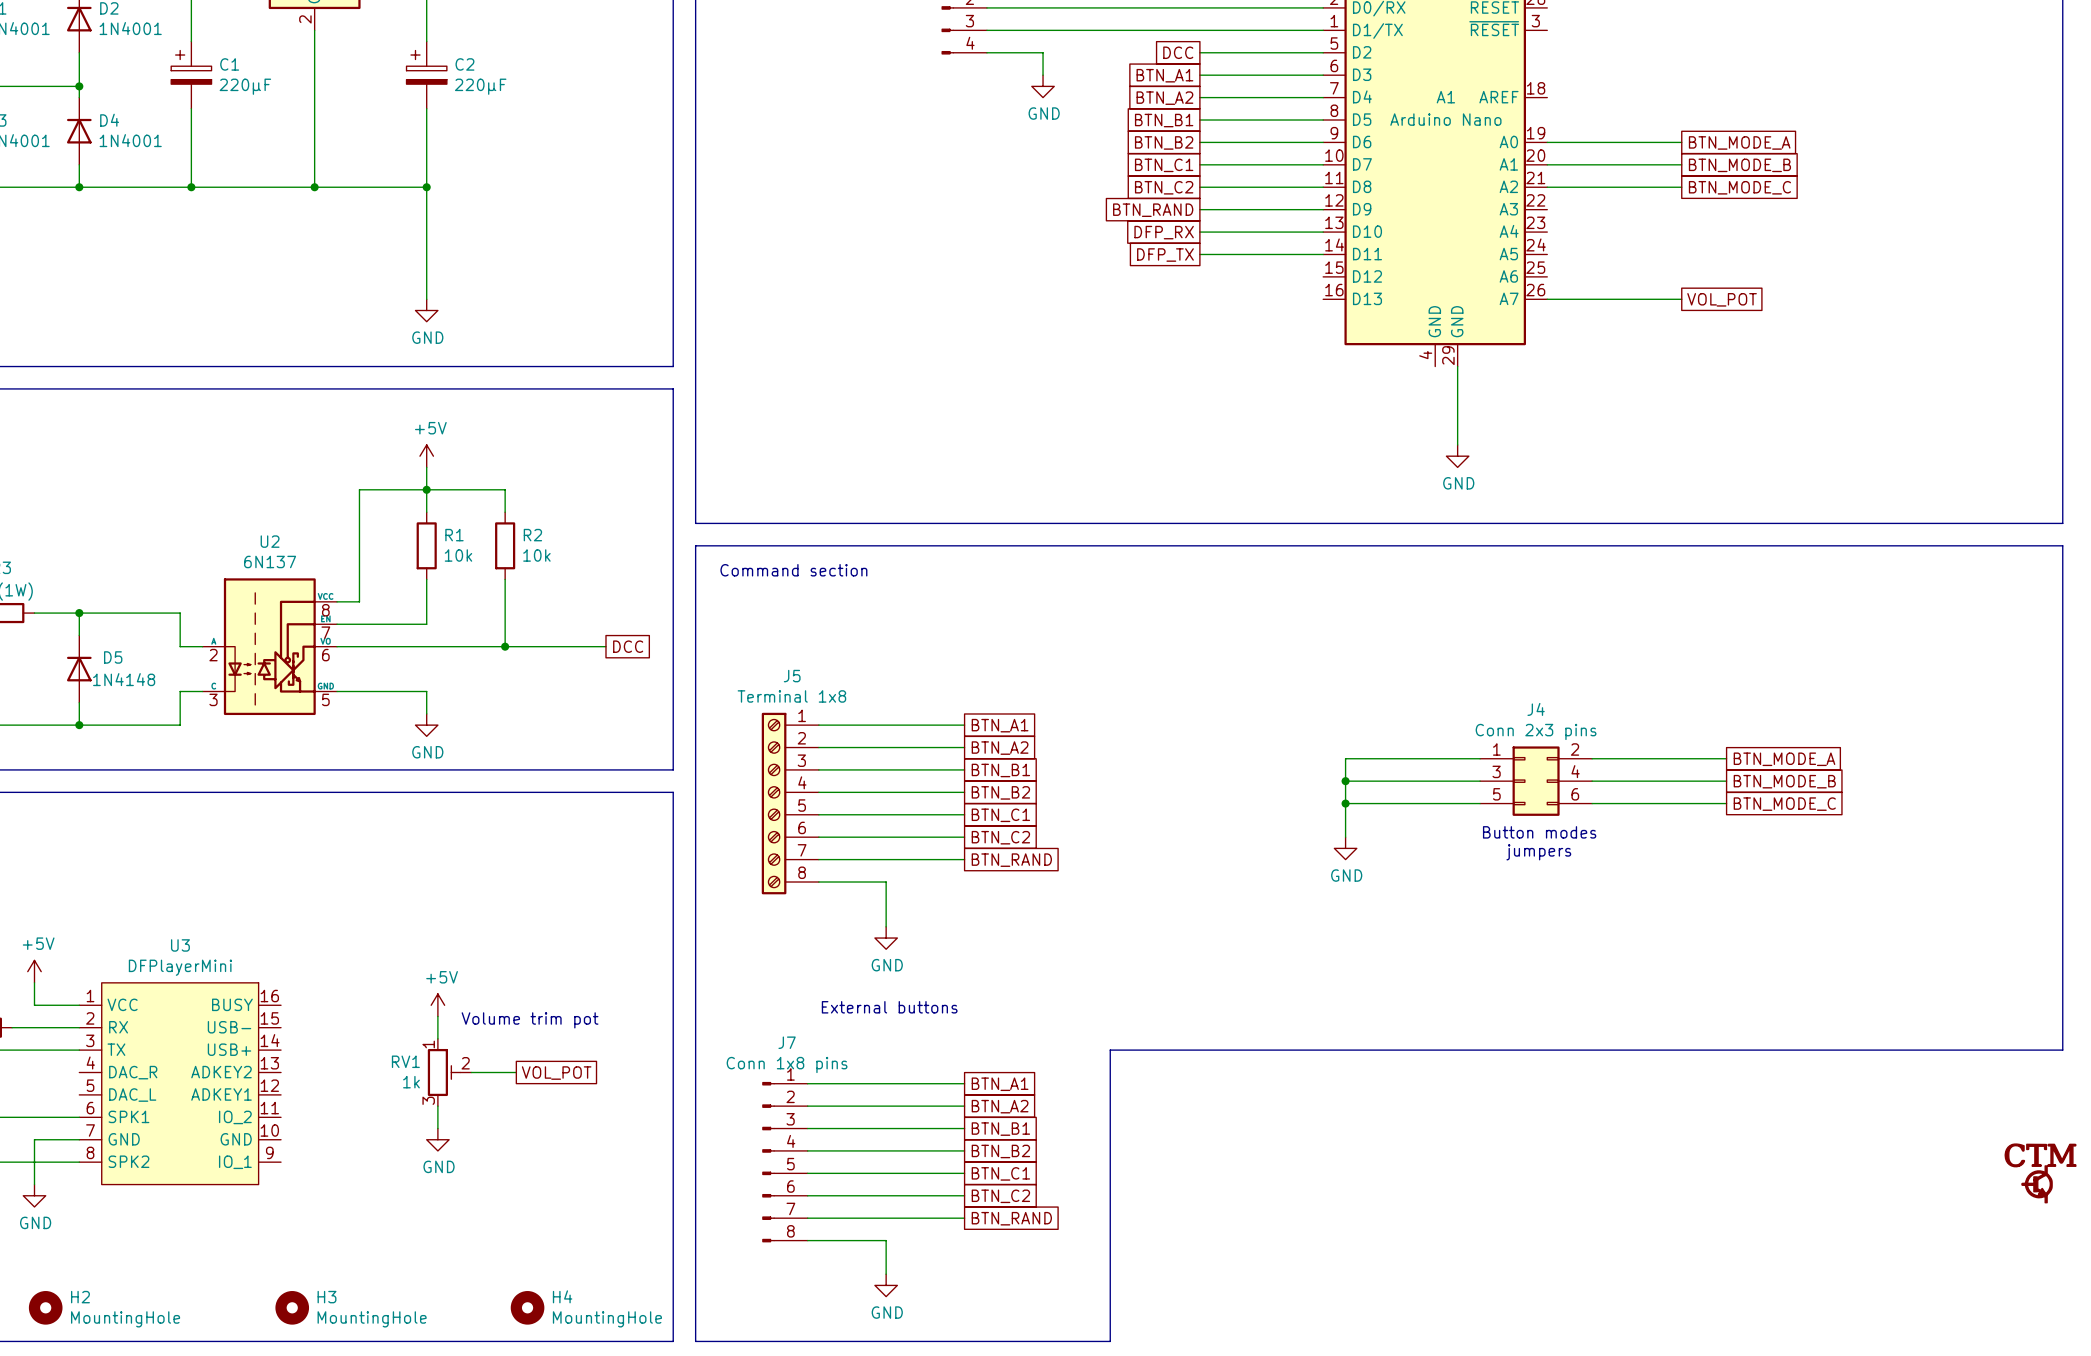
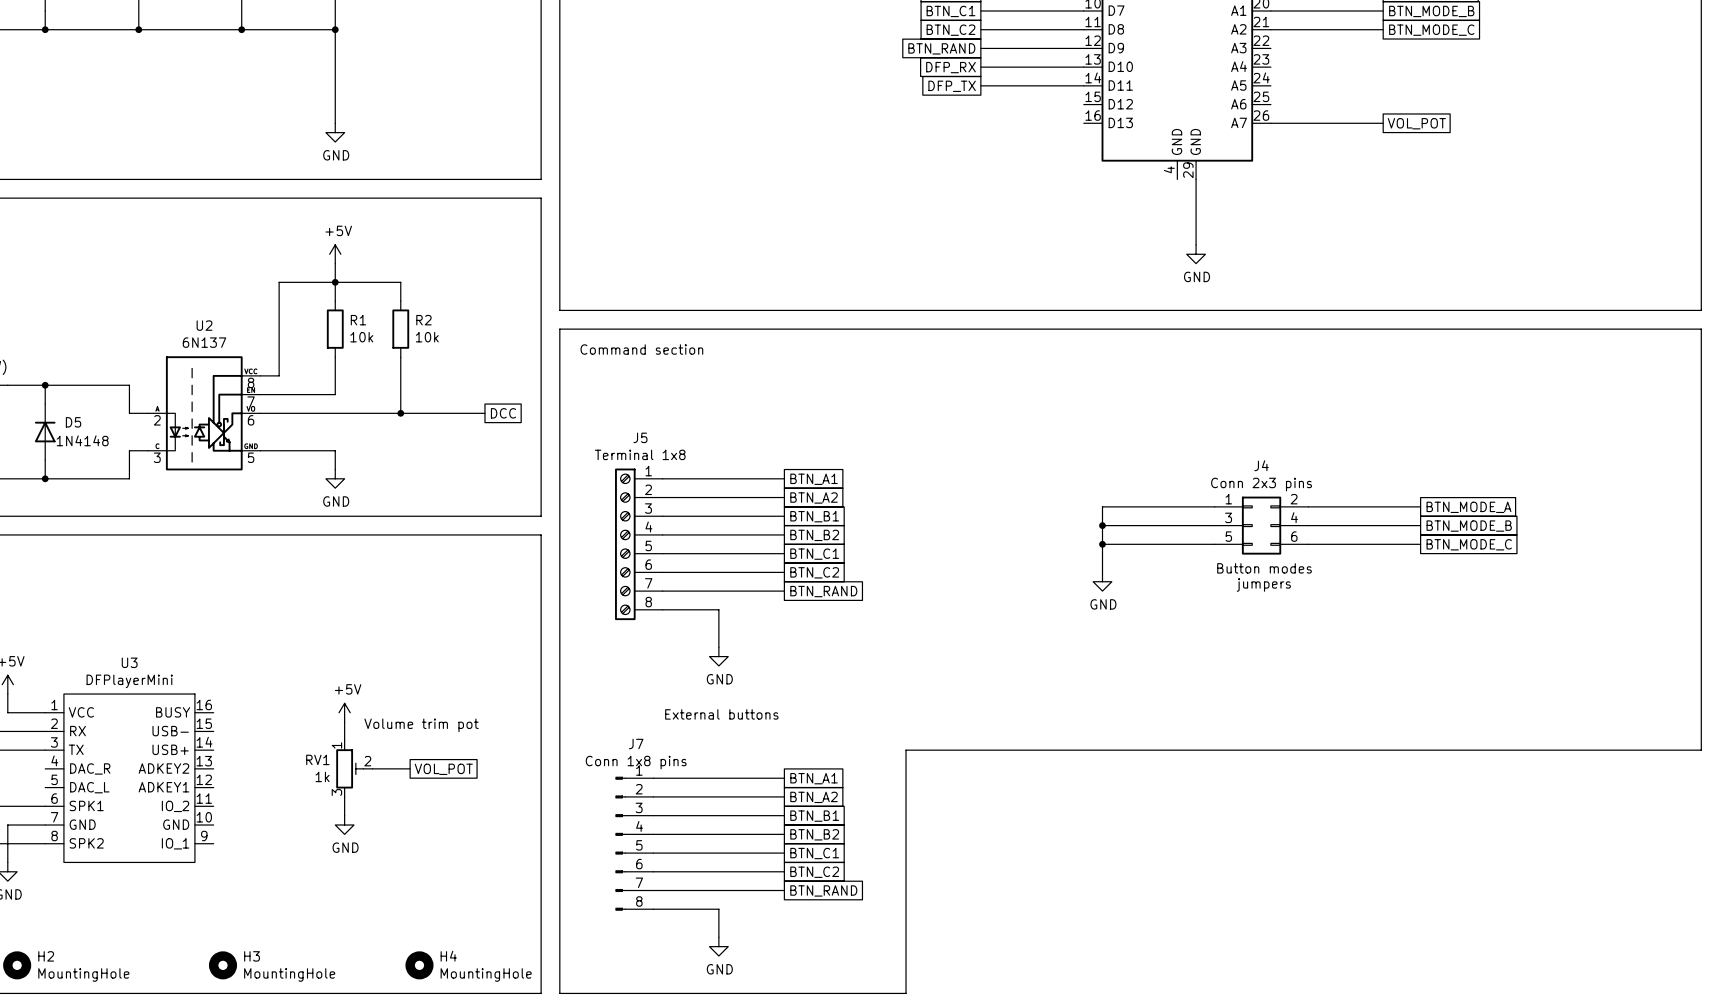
power symbol: (2040, 1173) -> none

